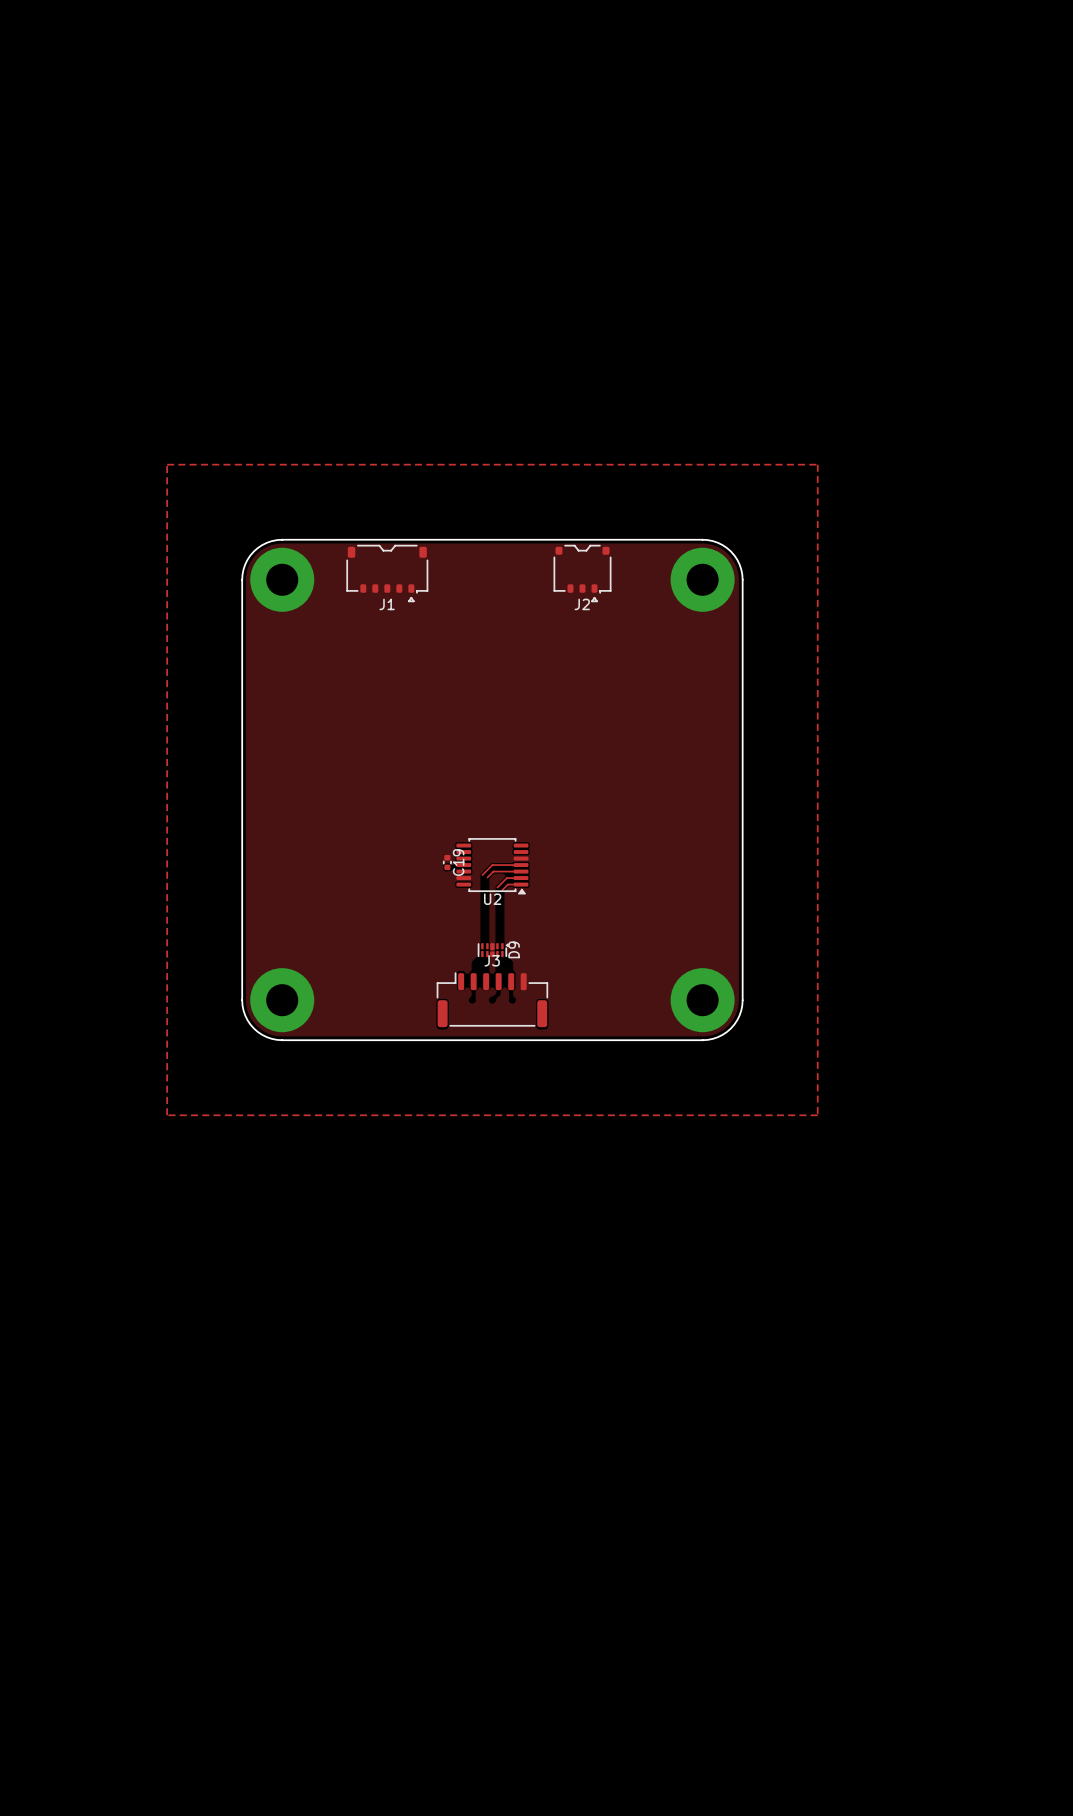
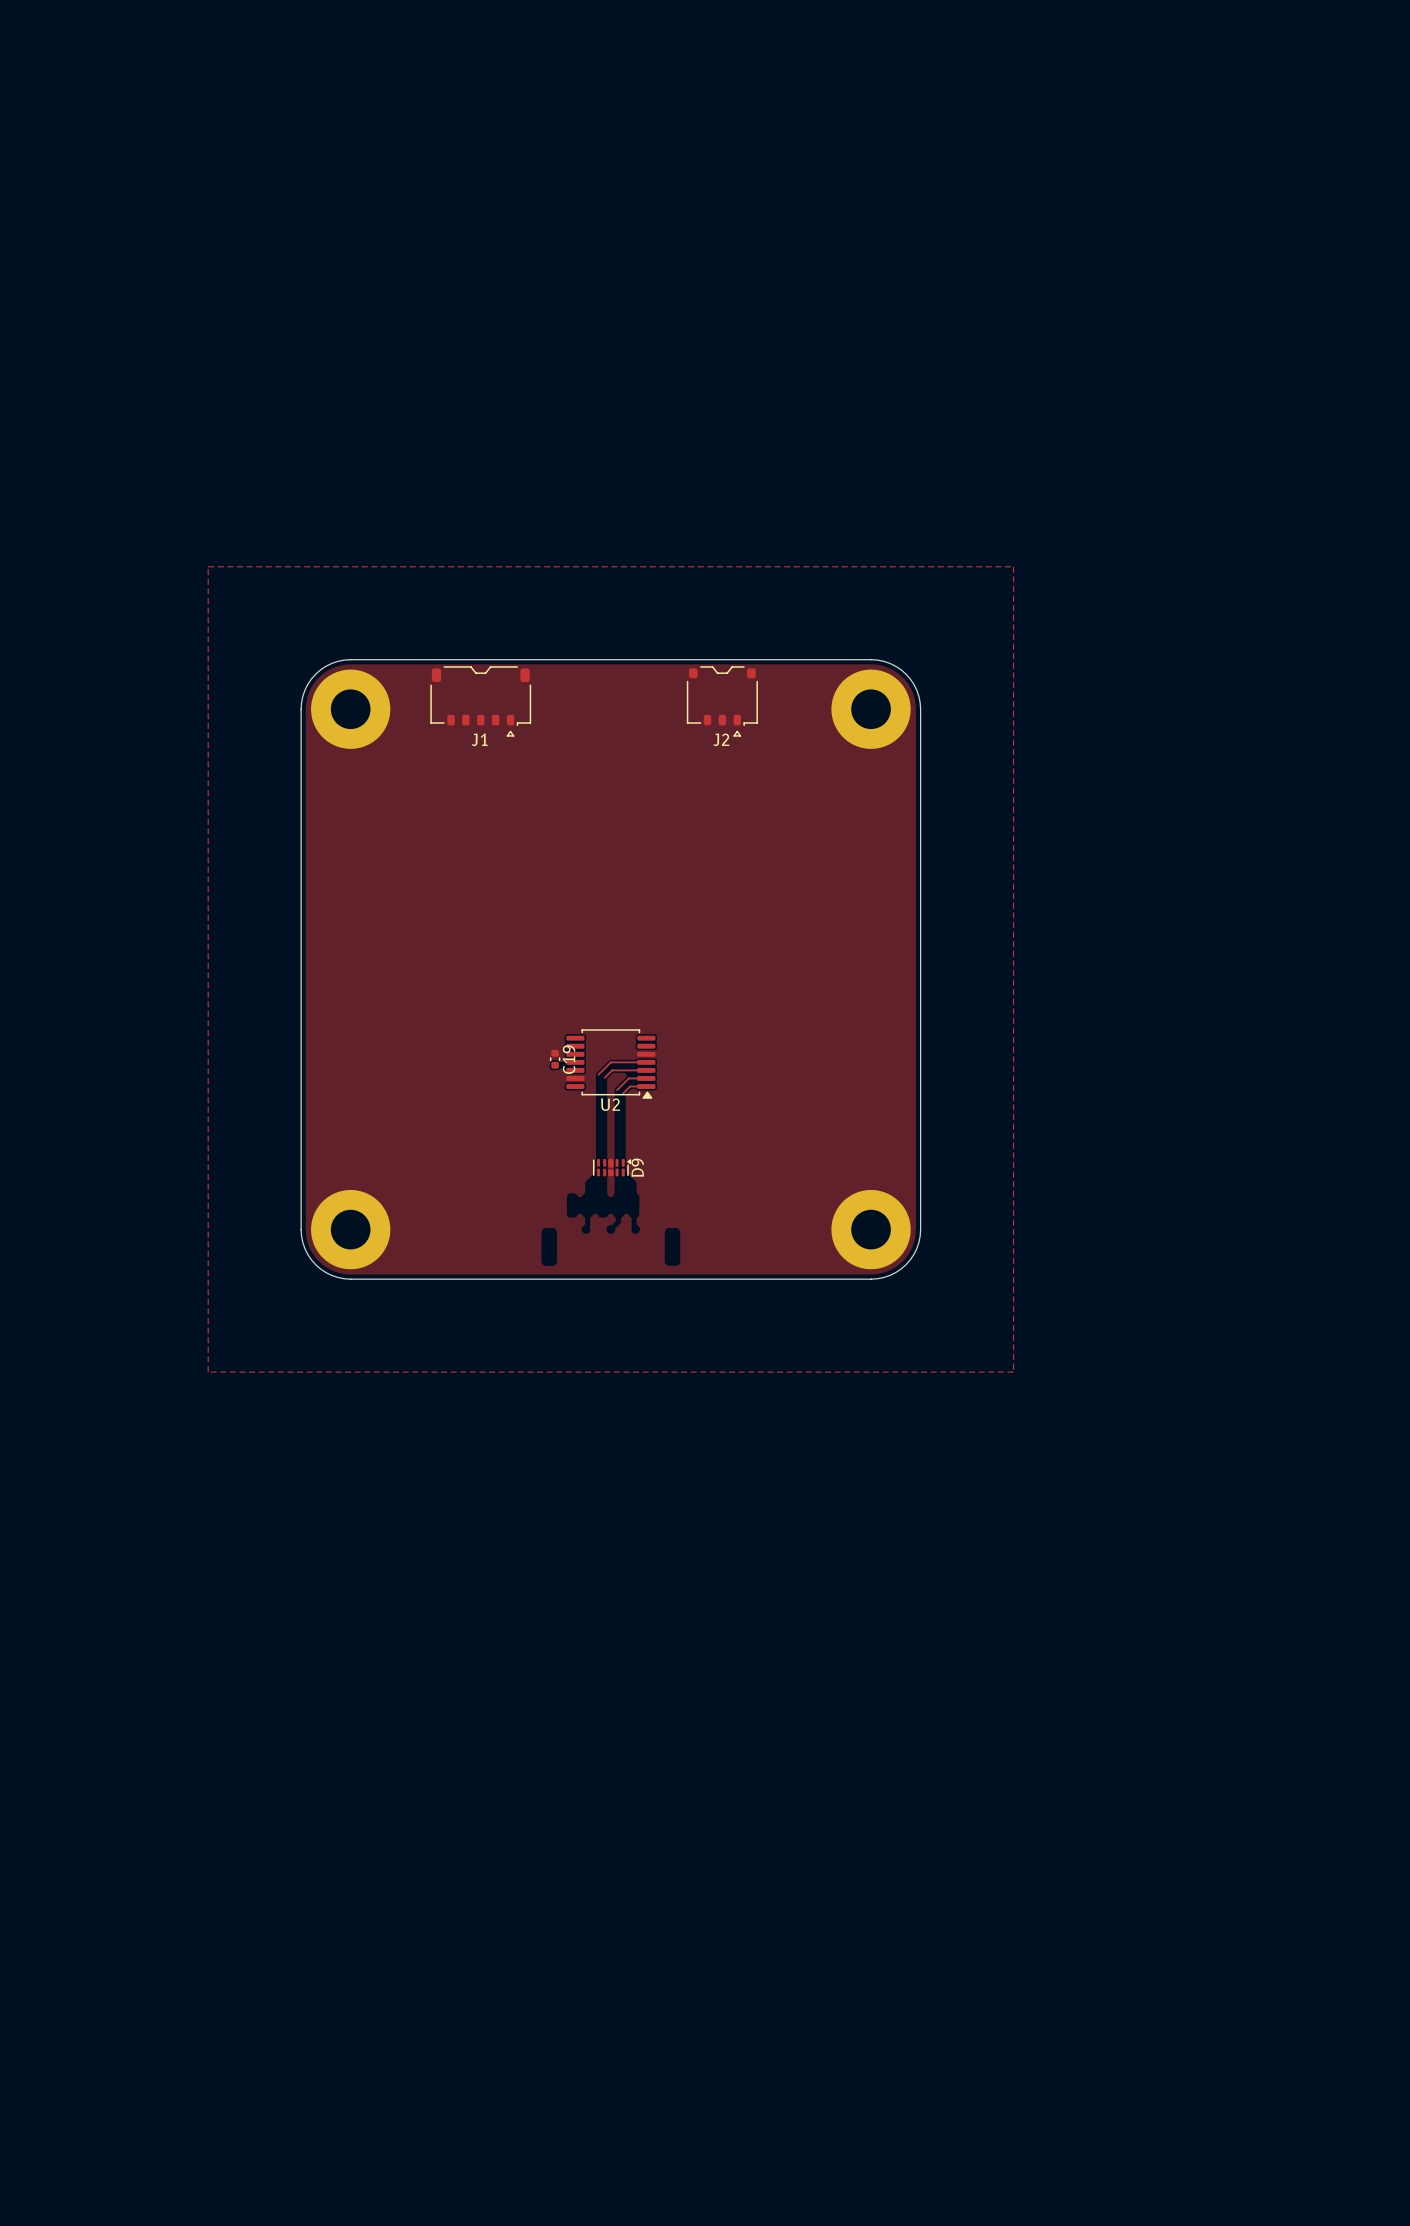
J3: (492, 999) -> none

